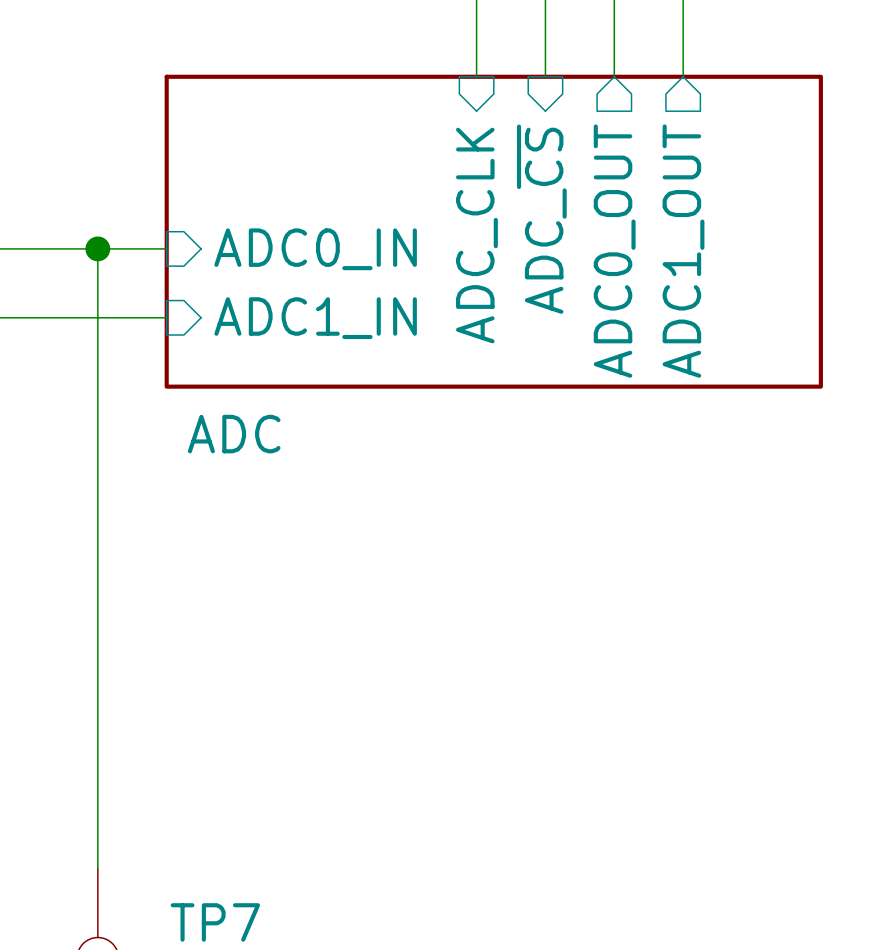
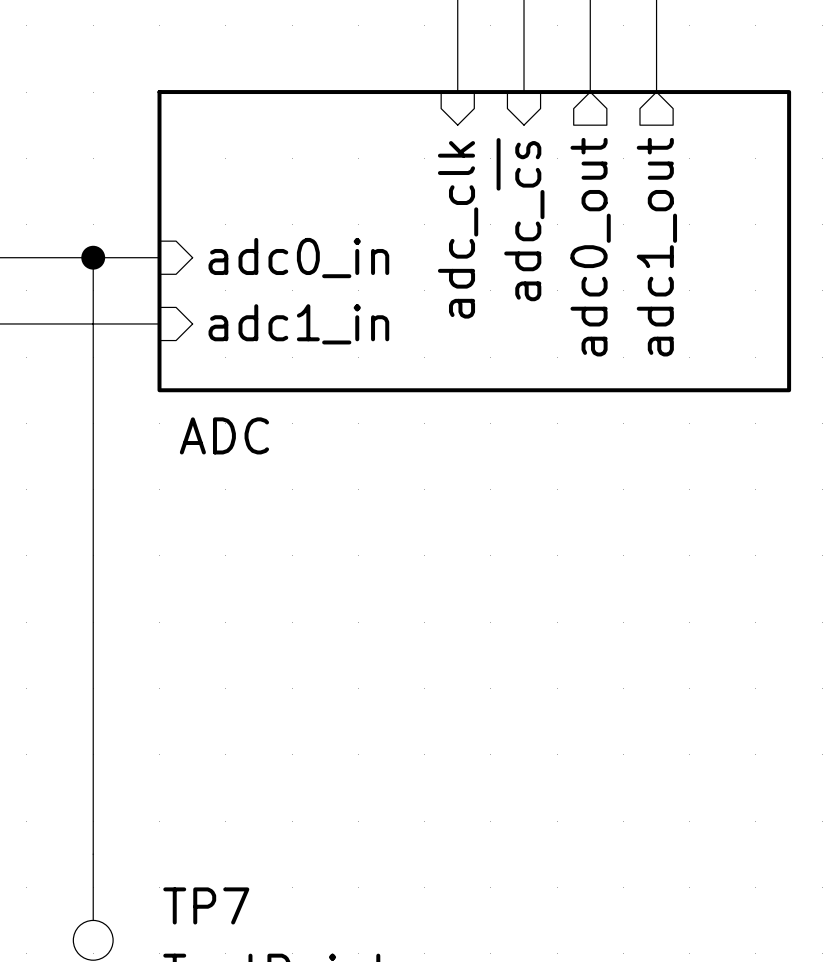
sheet pin: ADC_~{CS} (541, 219) -> adc_~{cs} (520, 219)
sheet pin: ADC_CLK (476, 235) -> adc_clk (458, 229)
sheet pin: ADC0_IN (315, 249) -> adc0_in (298, 258)
sheet pin: ADC0_OUT (614, 251) -> adc0_out (590, 247)
sheet pin: ADC1_OUT (683, 251) -> adc1_out (656, 247)
sheet pin: ADC1_IN (315, 318) -> adc1_in (298, 324)

